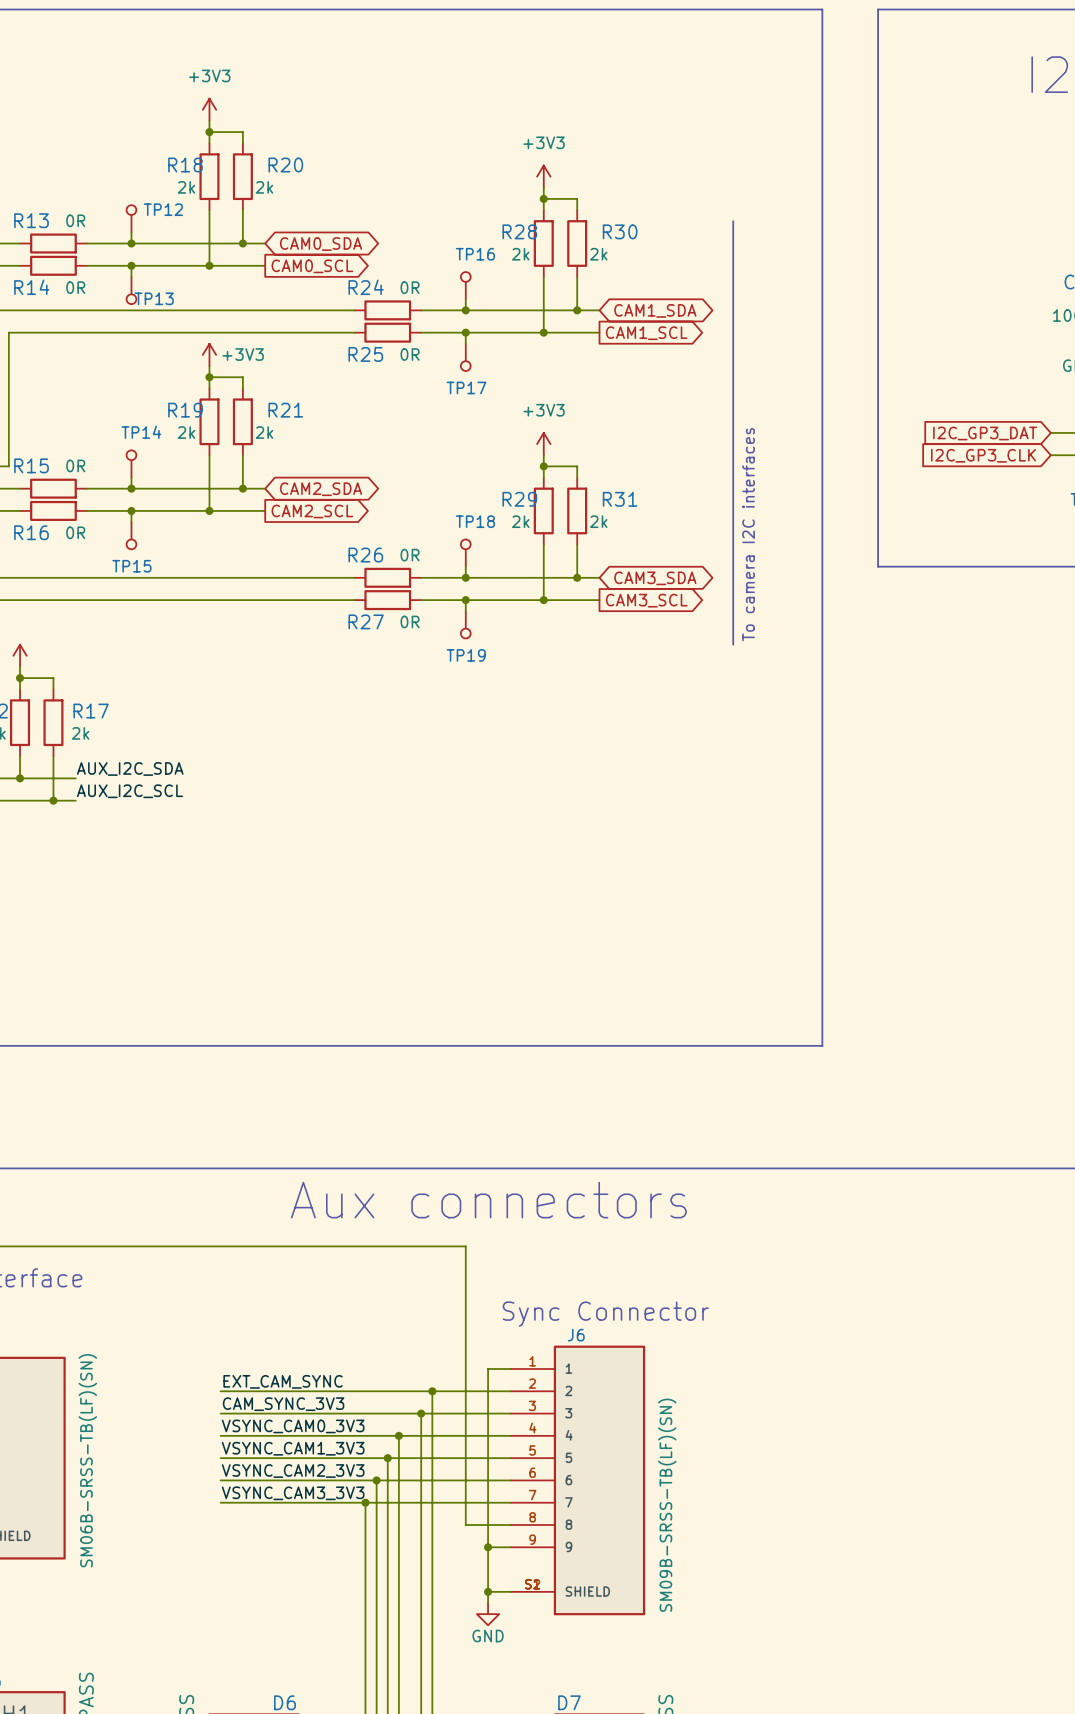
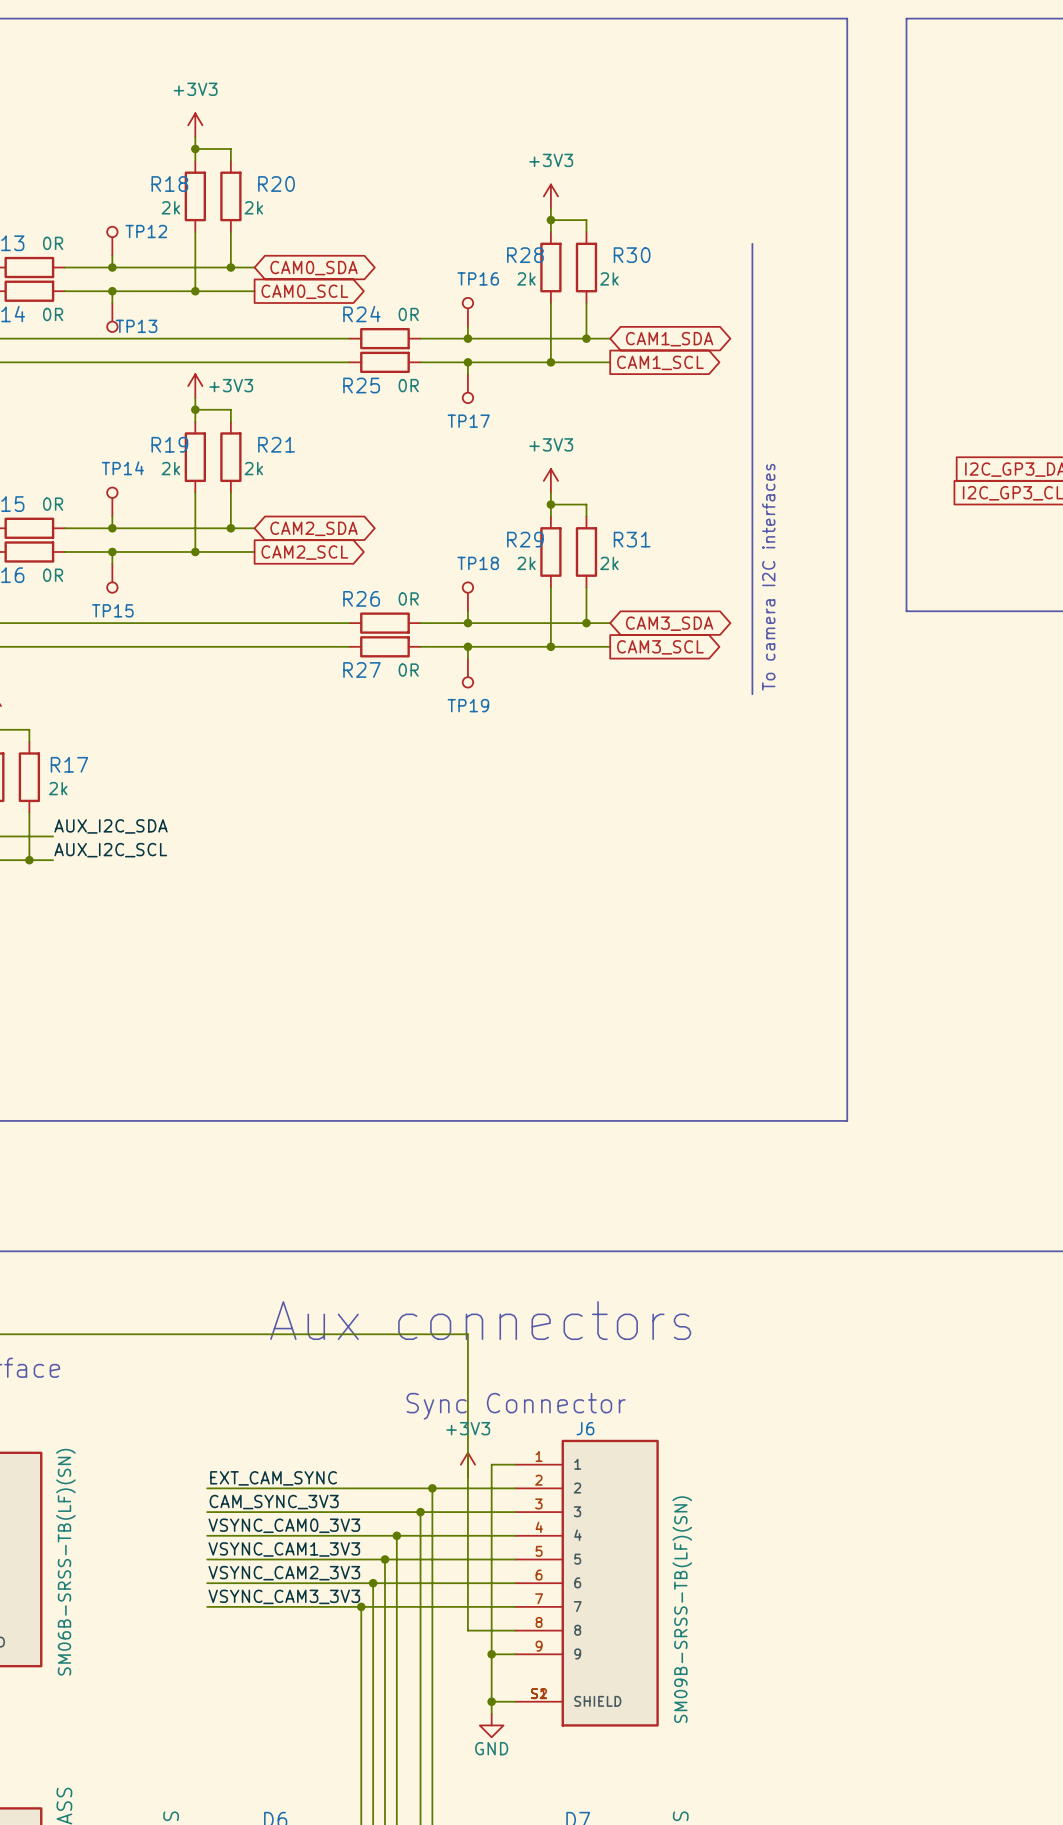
text position: Aux connectors (488, 1200) -> Aux connectors (480, 1320)
text position: Sync Connector (605, 1314) -> Sync Connector (516, 1406)
power symbol: none -> +3V3 (467, 1464)

